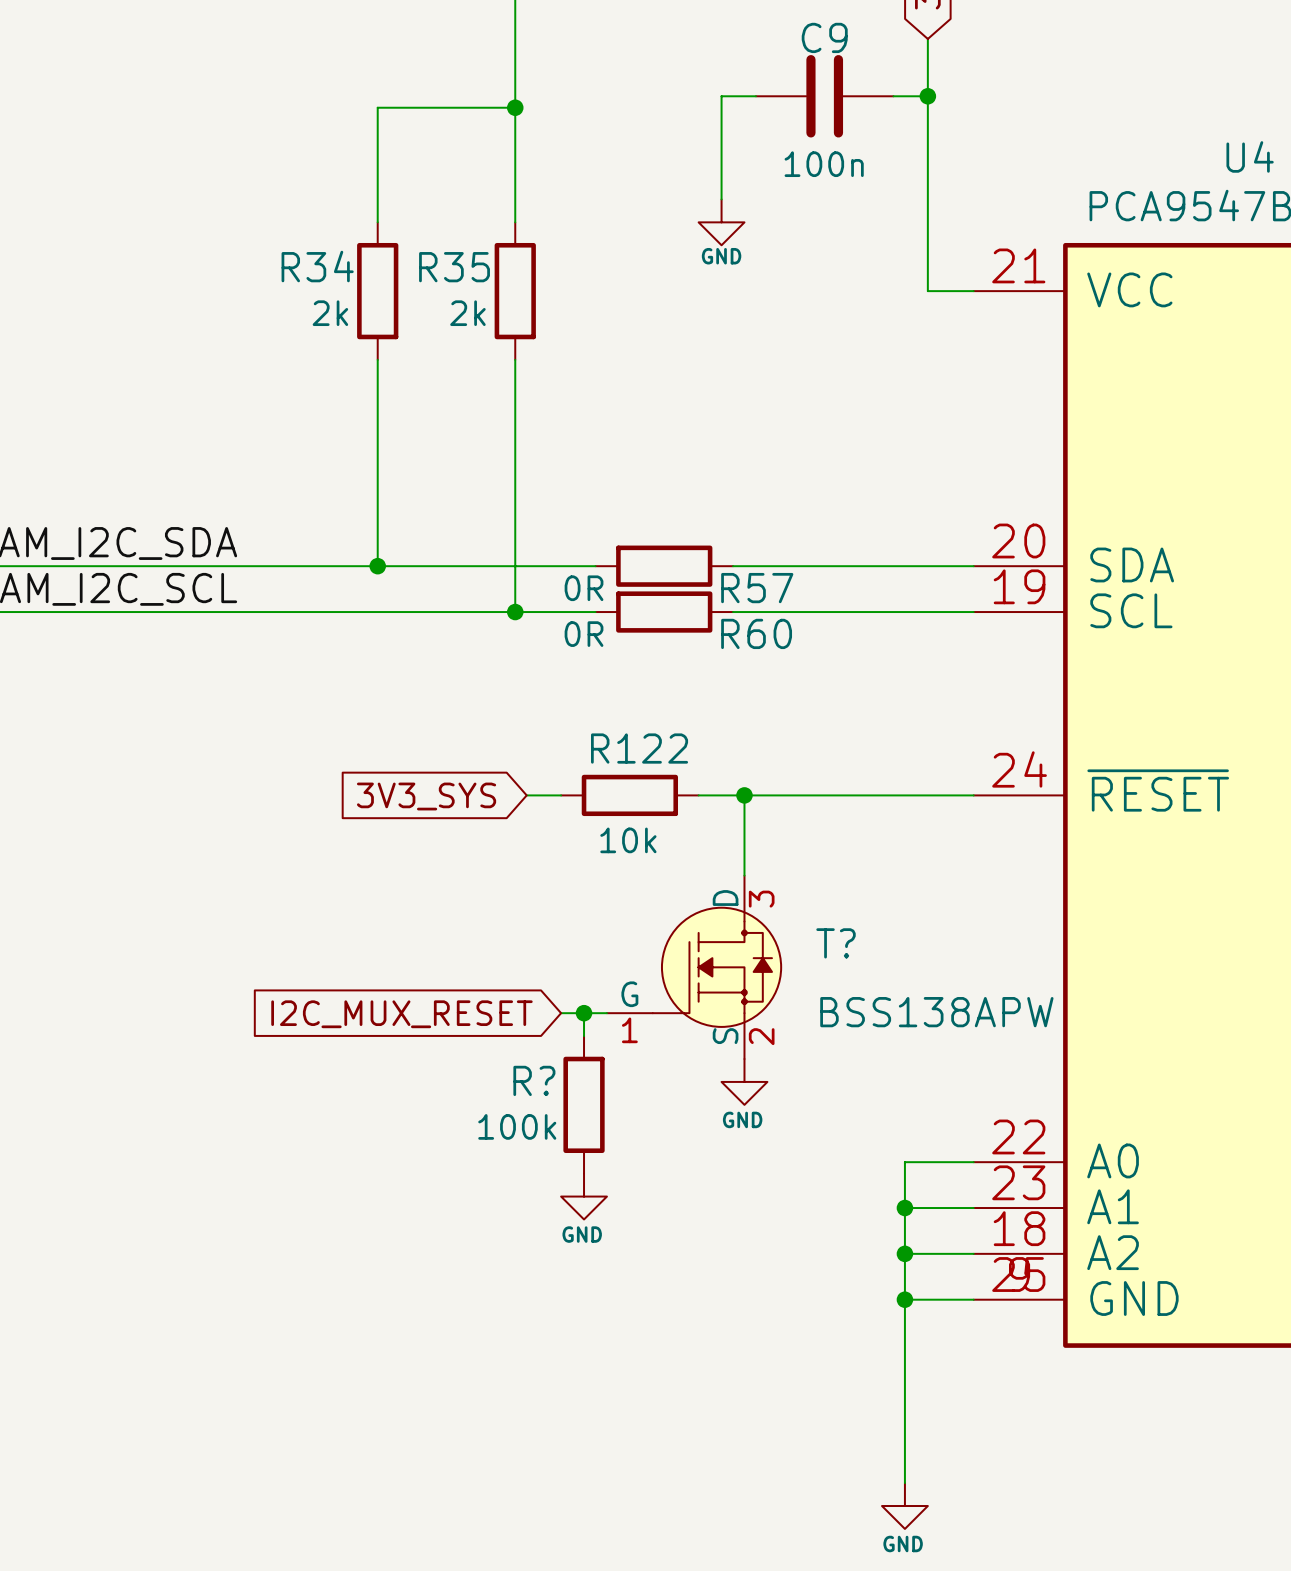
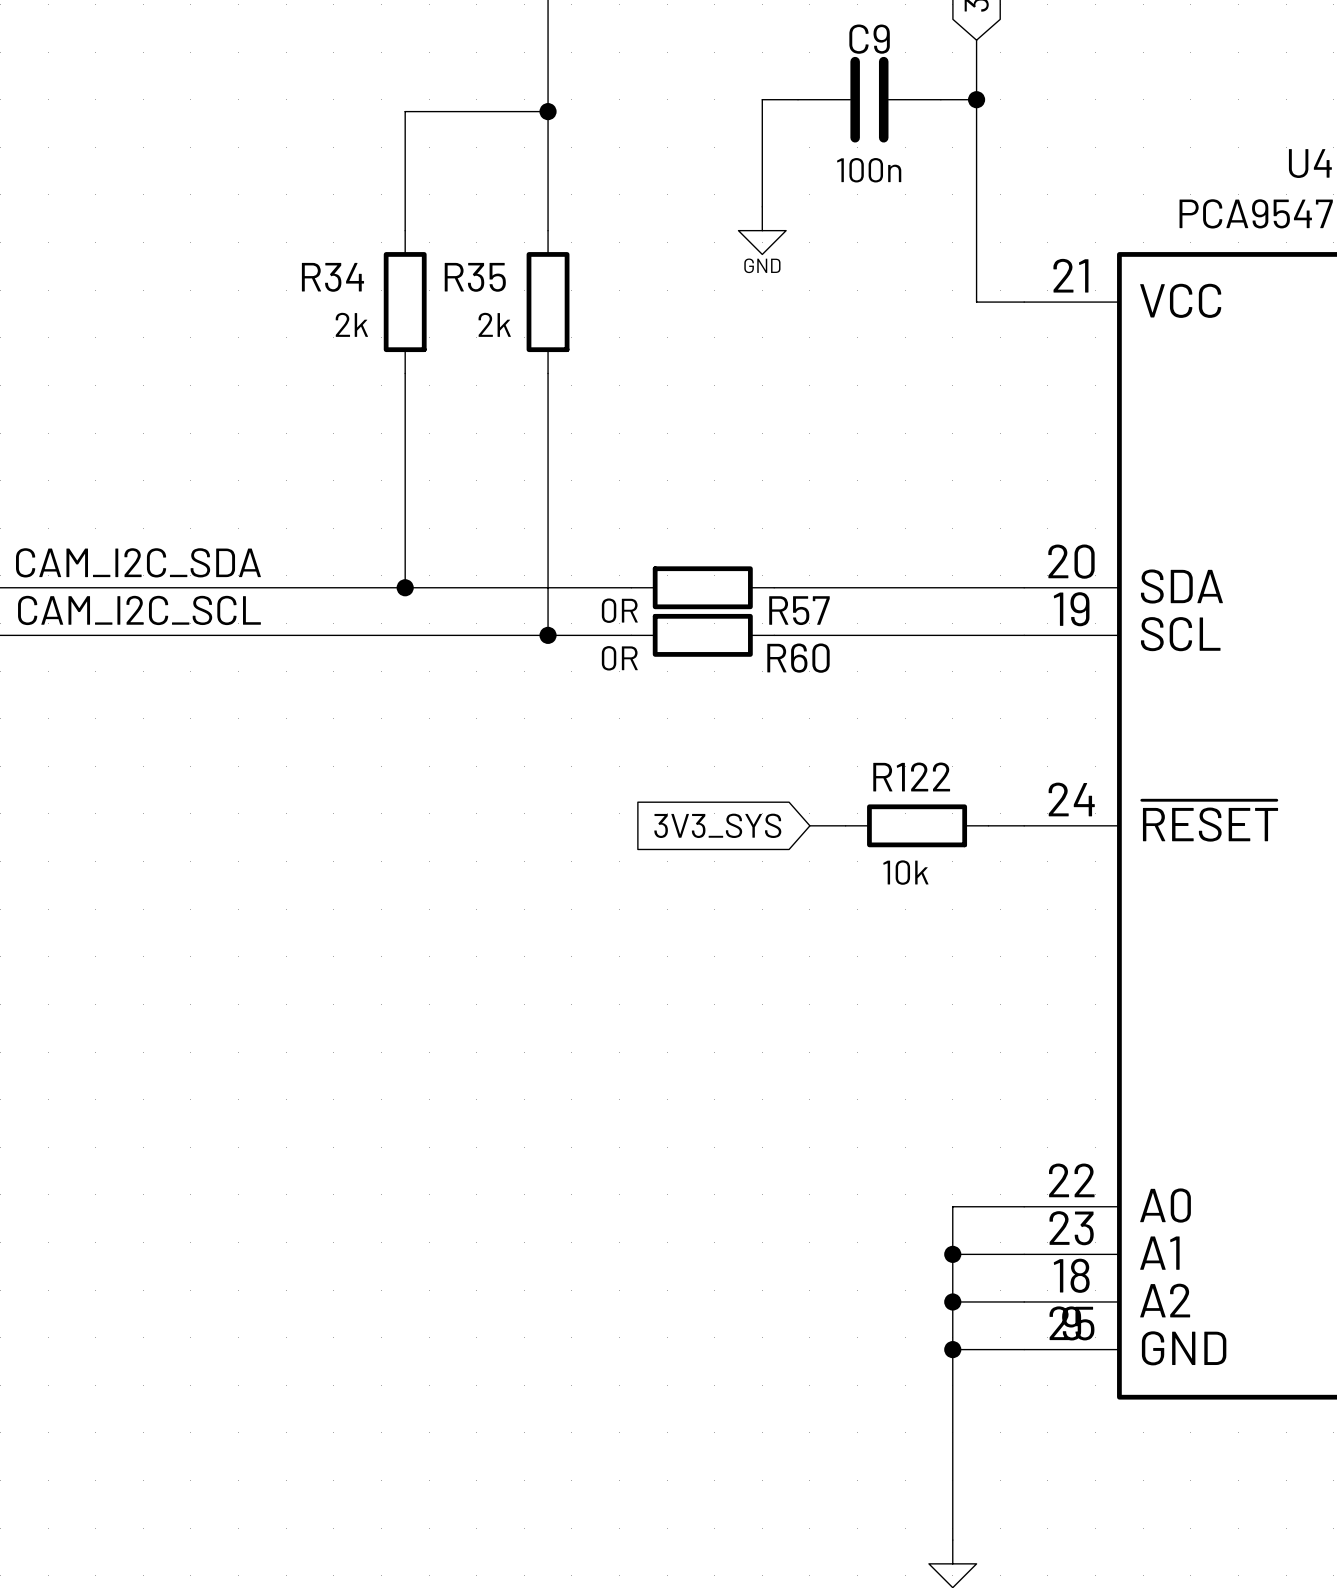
wire: (526, 795) (561, 795) -> none
R122 position: (629, 795) -> (917, 825)
wire: (698, 795) (767, 795) -> none
wire: (744, 795) (744, 875) -> none
junction: (744, 795) -> none
wire: (801, 795) (939, 795) -> none
global label position: 3V3_SYS (426, 796) -> 3V3_SYS (717, 825)
T?: BSS138APW (694, 967) -> none
wire: (561, 1013) (606, 1013) -> none
wire: (584, 1013) (584, 1036) -> none
junction: (584, 1013) -> none
global label: I2C_MUX_RESET (401, 1014) -> none
power symbol: GND (744, 1081) -> none
R?: (584, 1104) -> none
power symbol: GND (584, 1196) -> none

